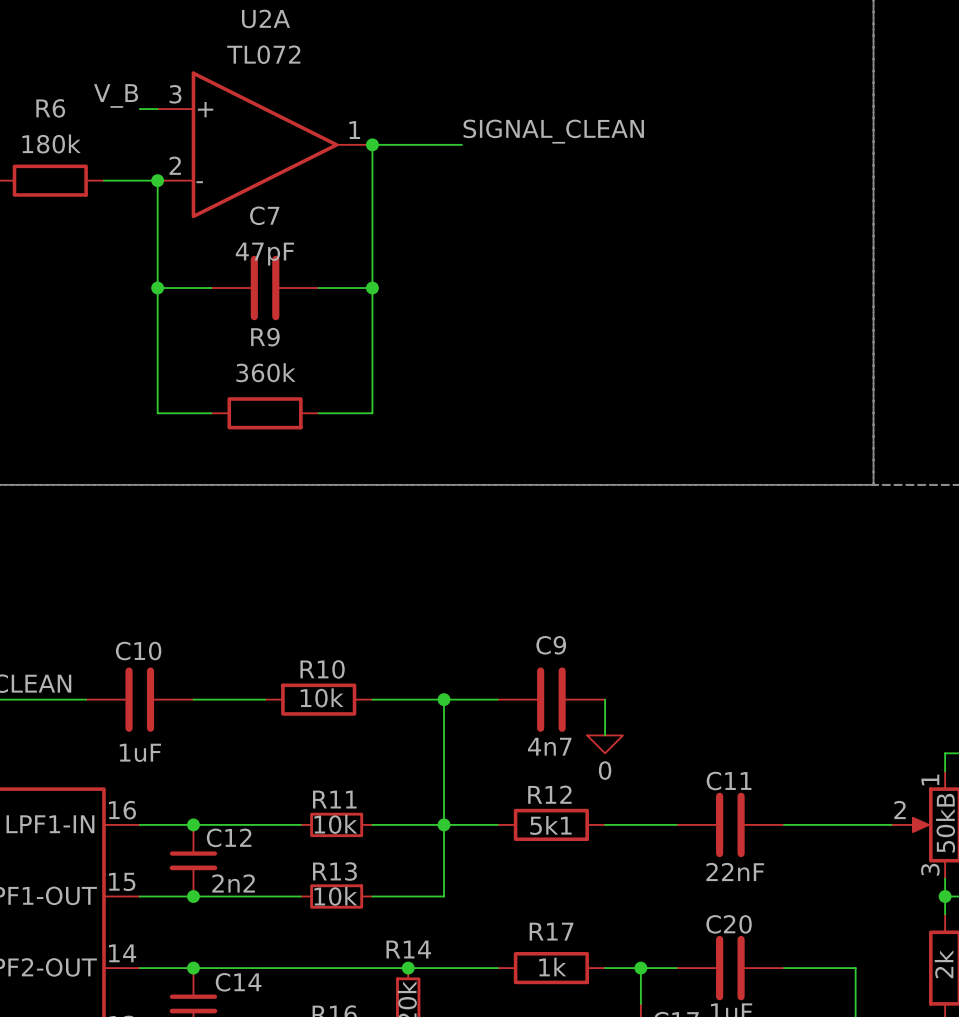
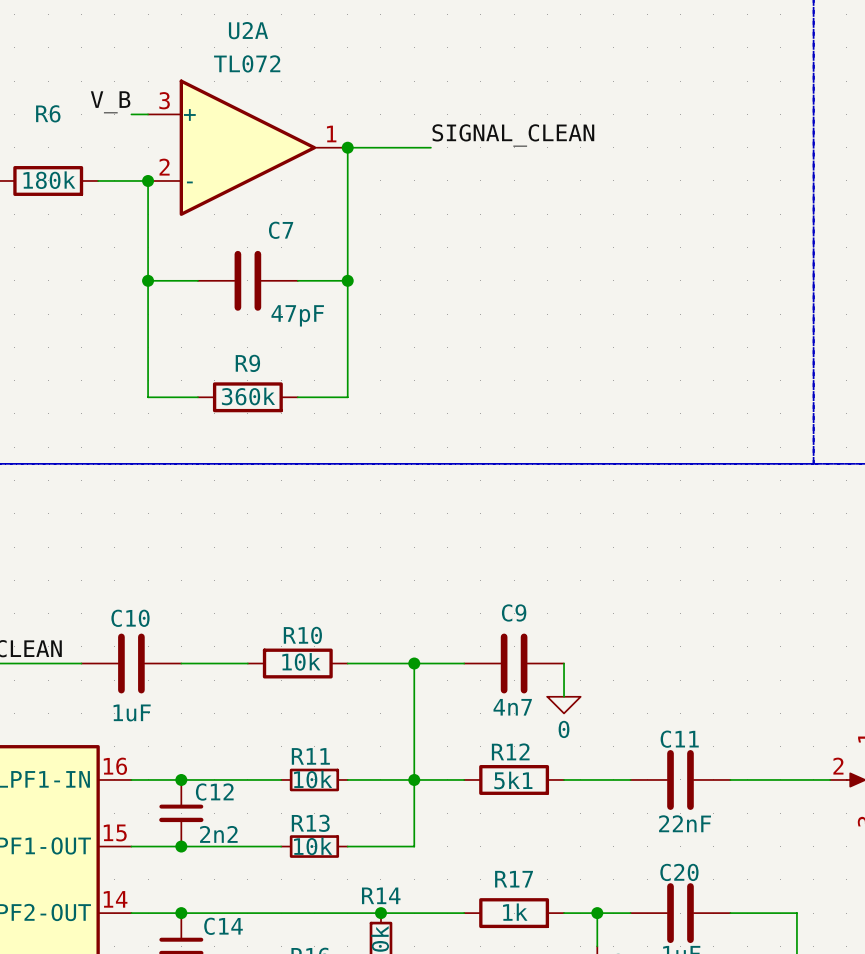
R6 value position: 180k (51, 143) -> 180k (49, 180)
C7 name position: C7 (264, 215) -> C7 (281, 230)
C7 value position: 47pF (264, 254) -> 47pF (297, 315)
R9 name position: R9 (265, 337) -> R9 (247, 363)
R9 value position: 360k (265, 372) -> 360k (248, 396)

